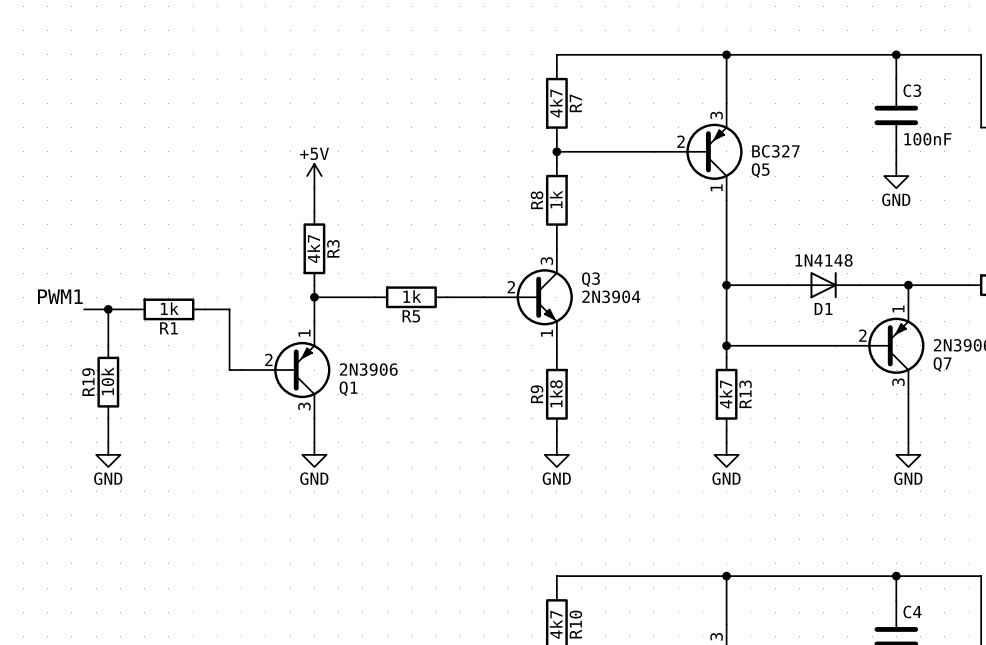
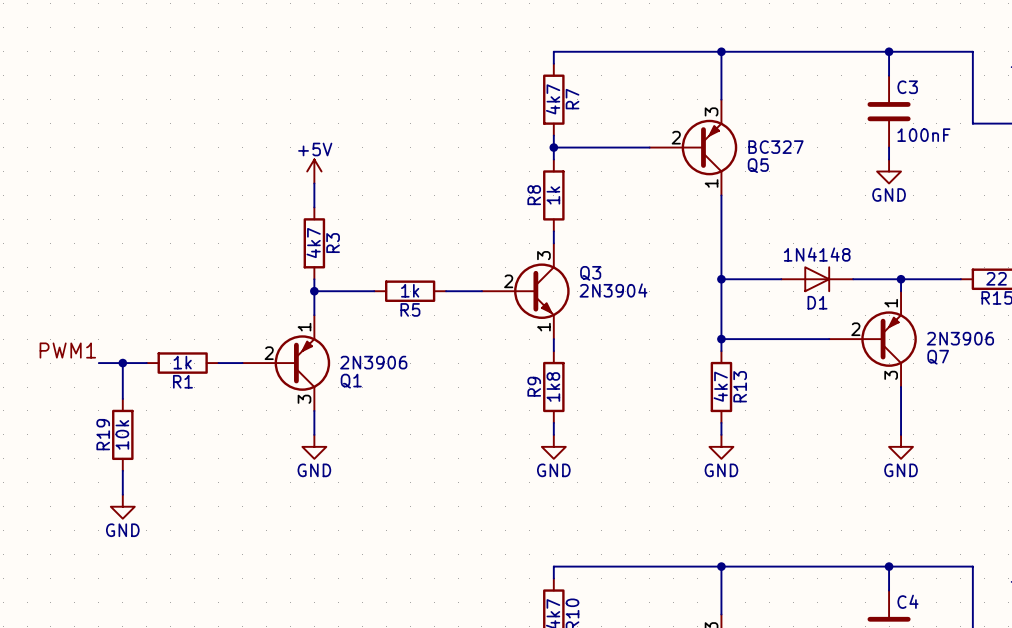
label position: PWM1 (60, 296) -> PWM1 (67, 350)
wire: (84, 309) (132, 309) -> (98, 363) (146, 363)
wire: (108, 309) (108, 345) -> (122, 363) (122, 398)
junction: (108, 309) -> none
R1 position: (168, 309) -> (182, 363)
wire: (205, 309) (229, 309) (229, 370) -> (218, 363) (230, 363)
junction: none -> (122, 363)
R19 position: (108, 382) -> (122, 434)
wire: (108, 418) (108, 442) -> (122, 470) (122, 494)
power symbol position: GND (108, 454) -> GND (122, 506)

